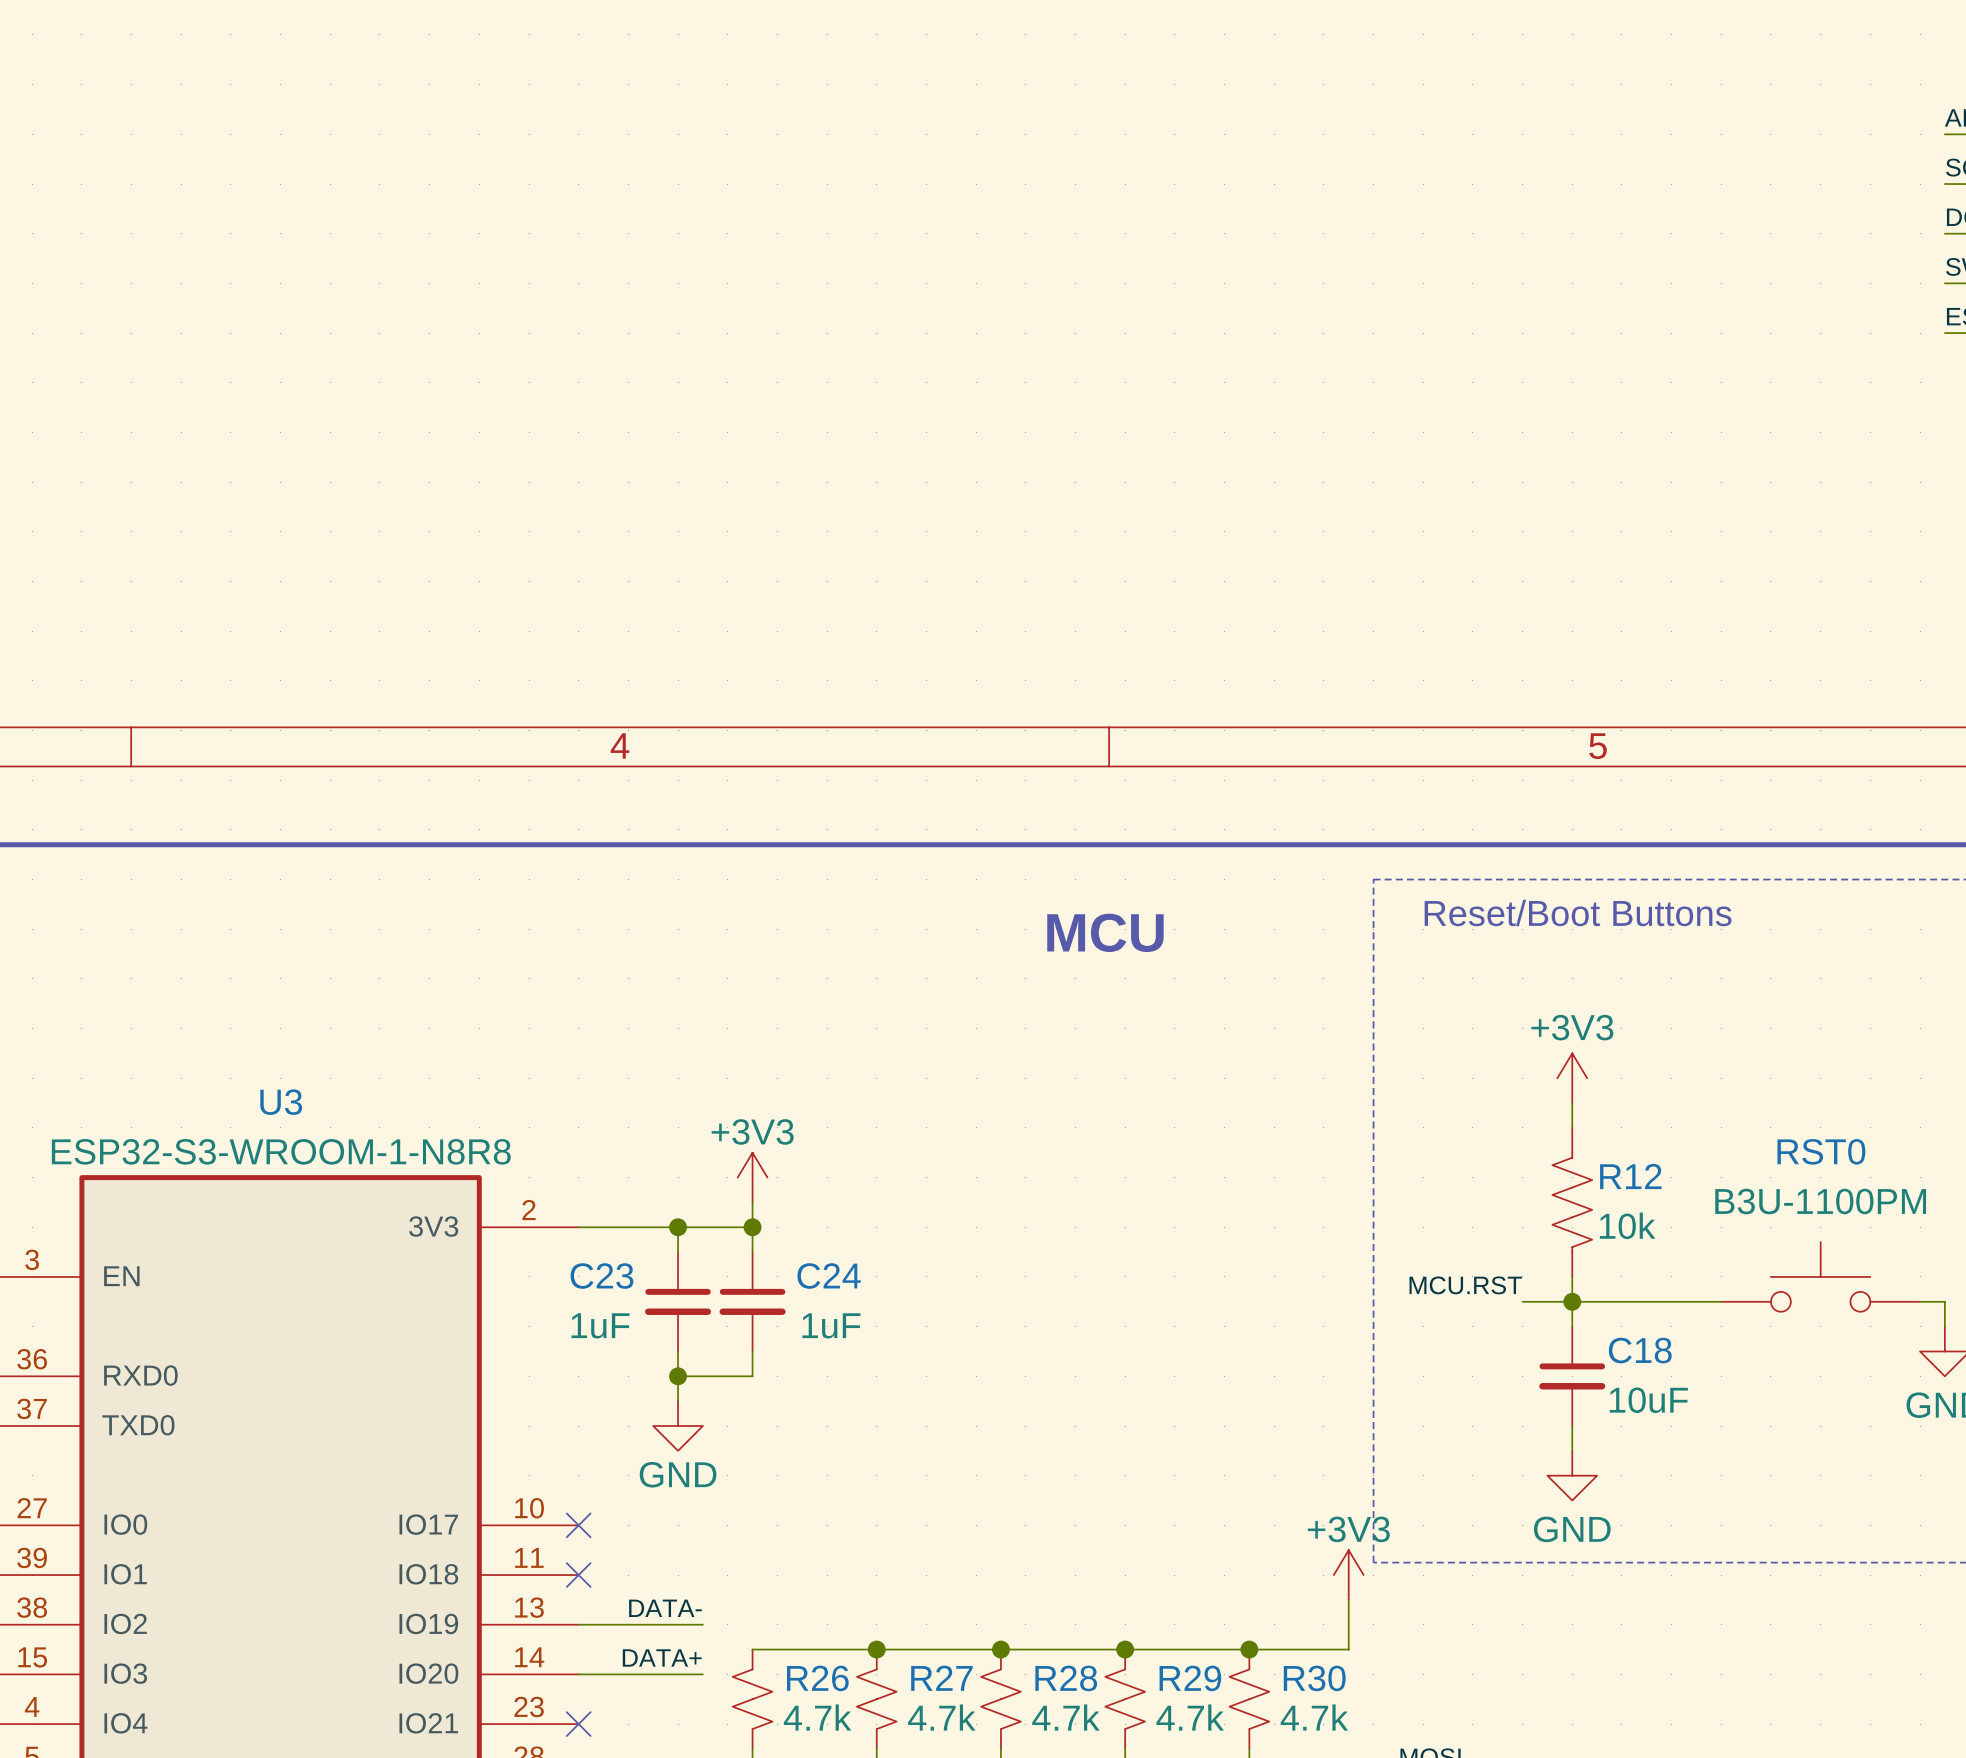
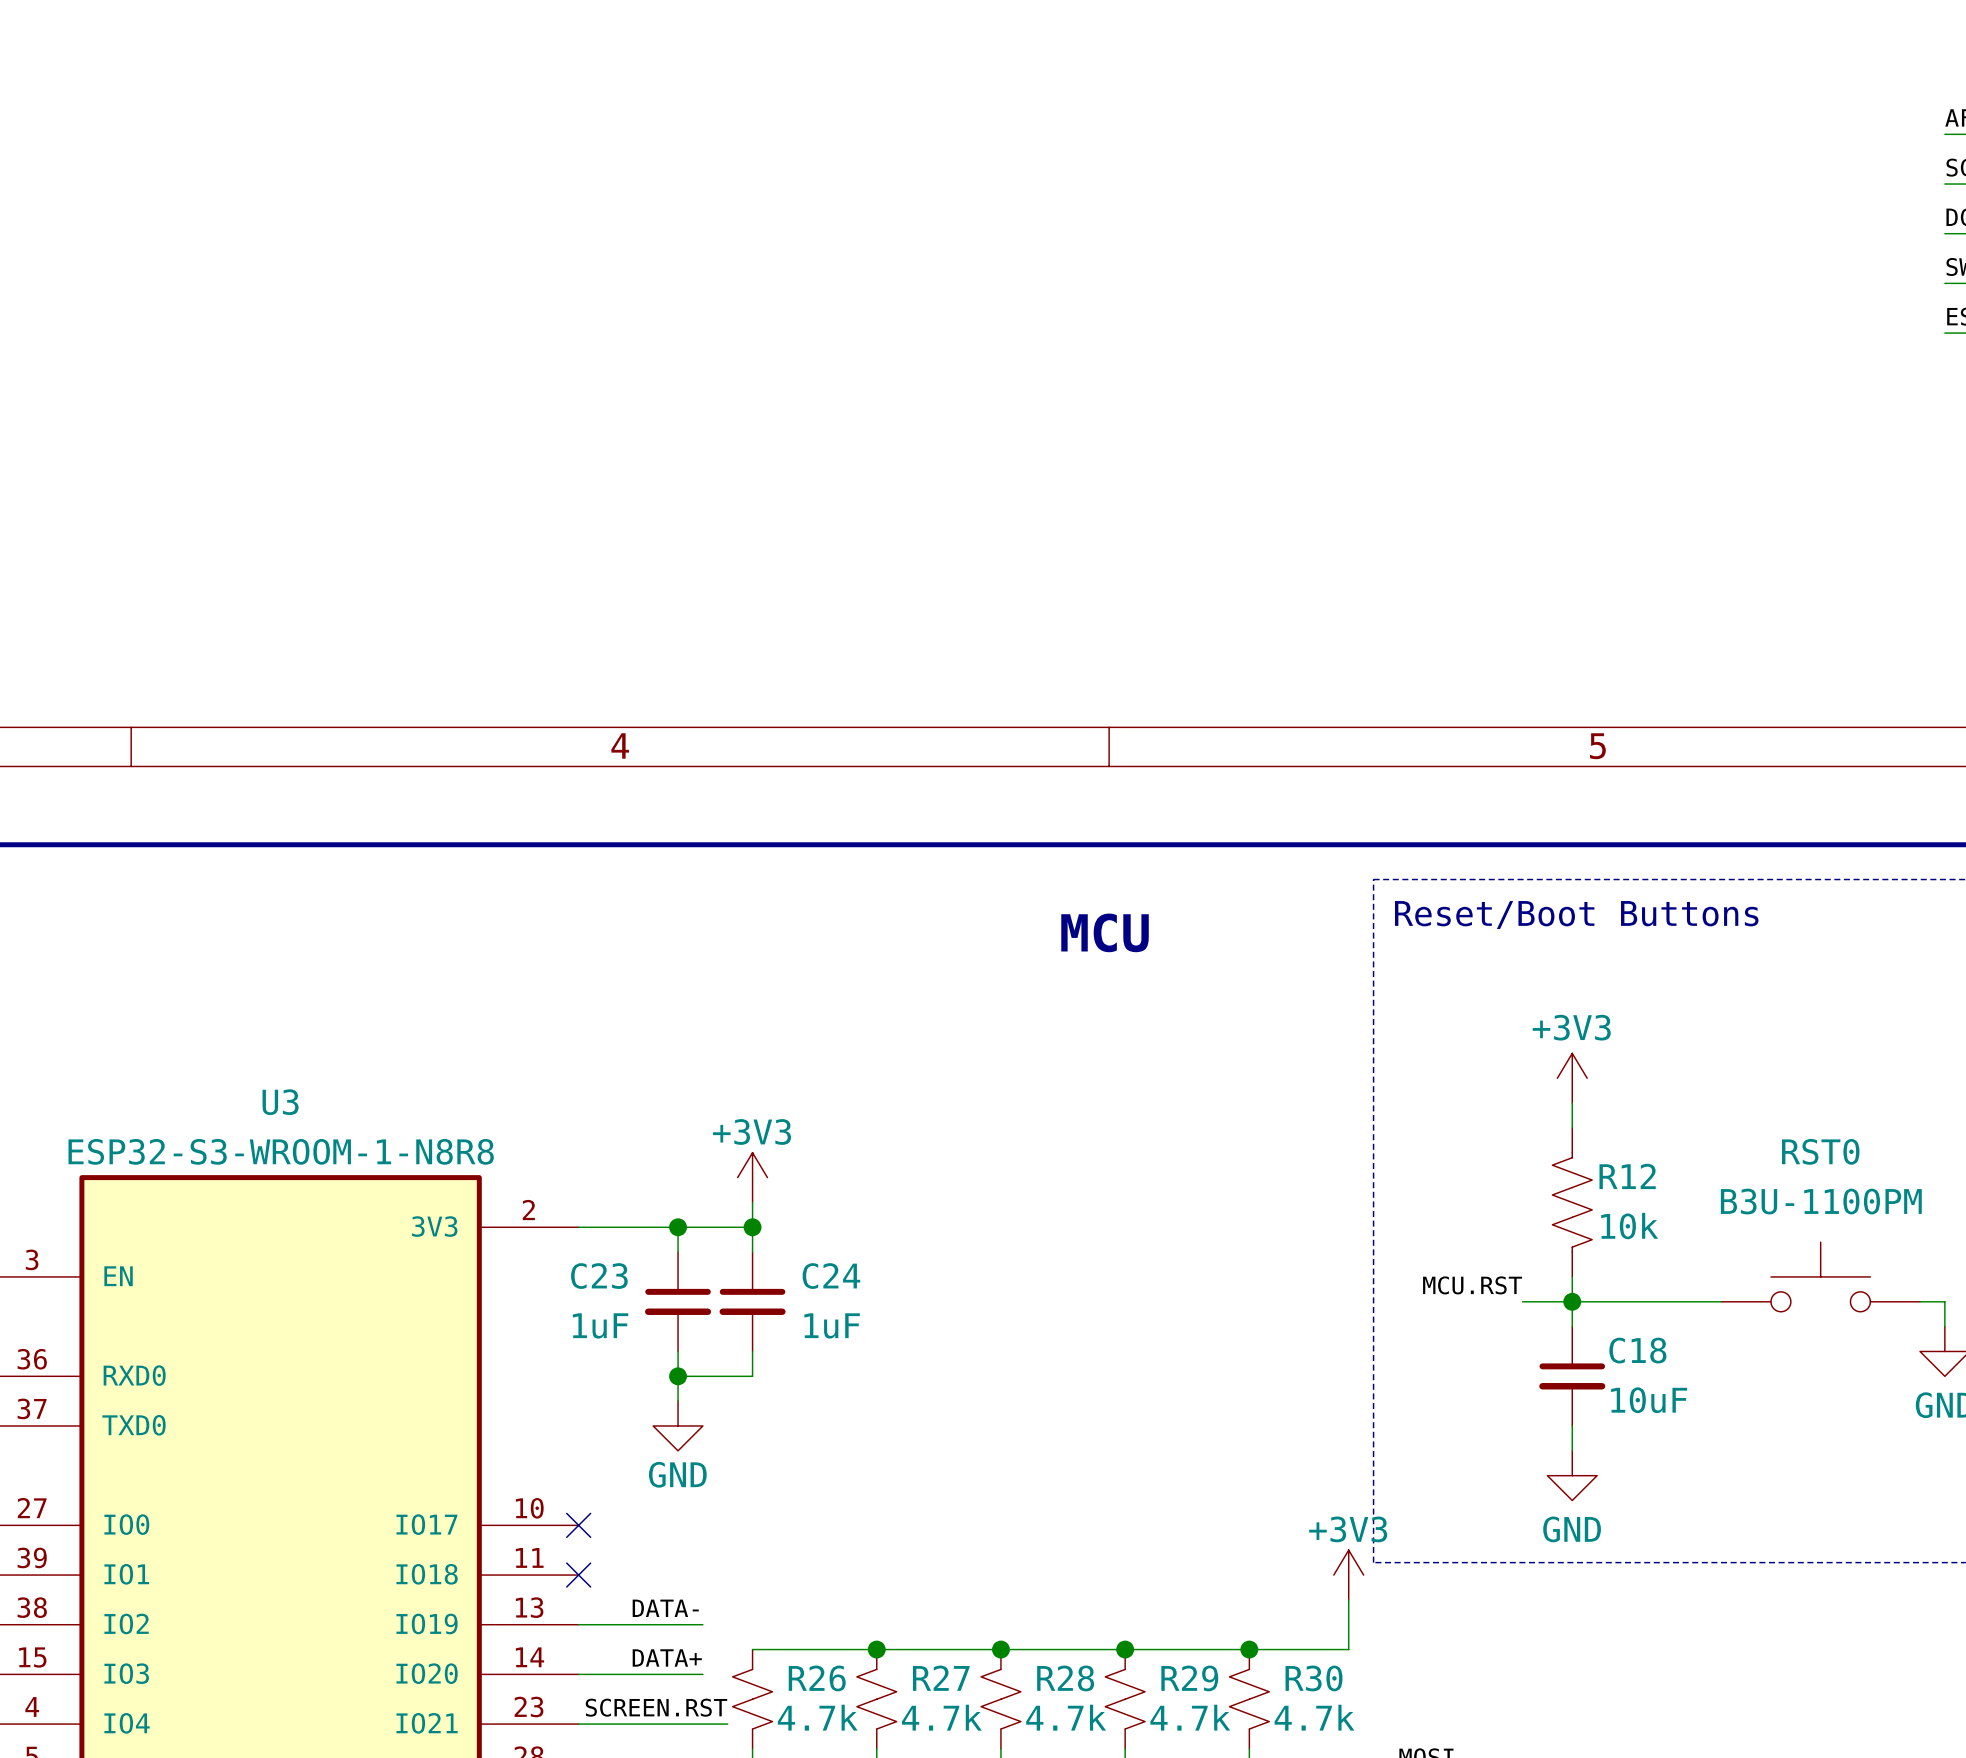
label: none -> SCREEN.RST (656, 1707)
wire: none -> (578, 1724) (727, 1724)
no-connect mark: (578, 1724) -> none

